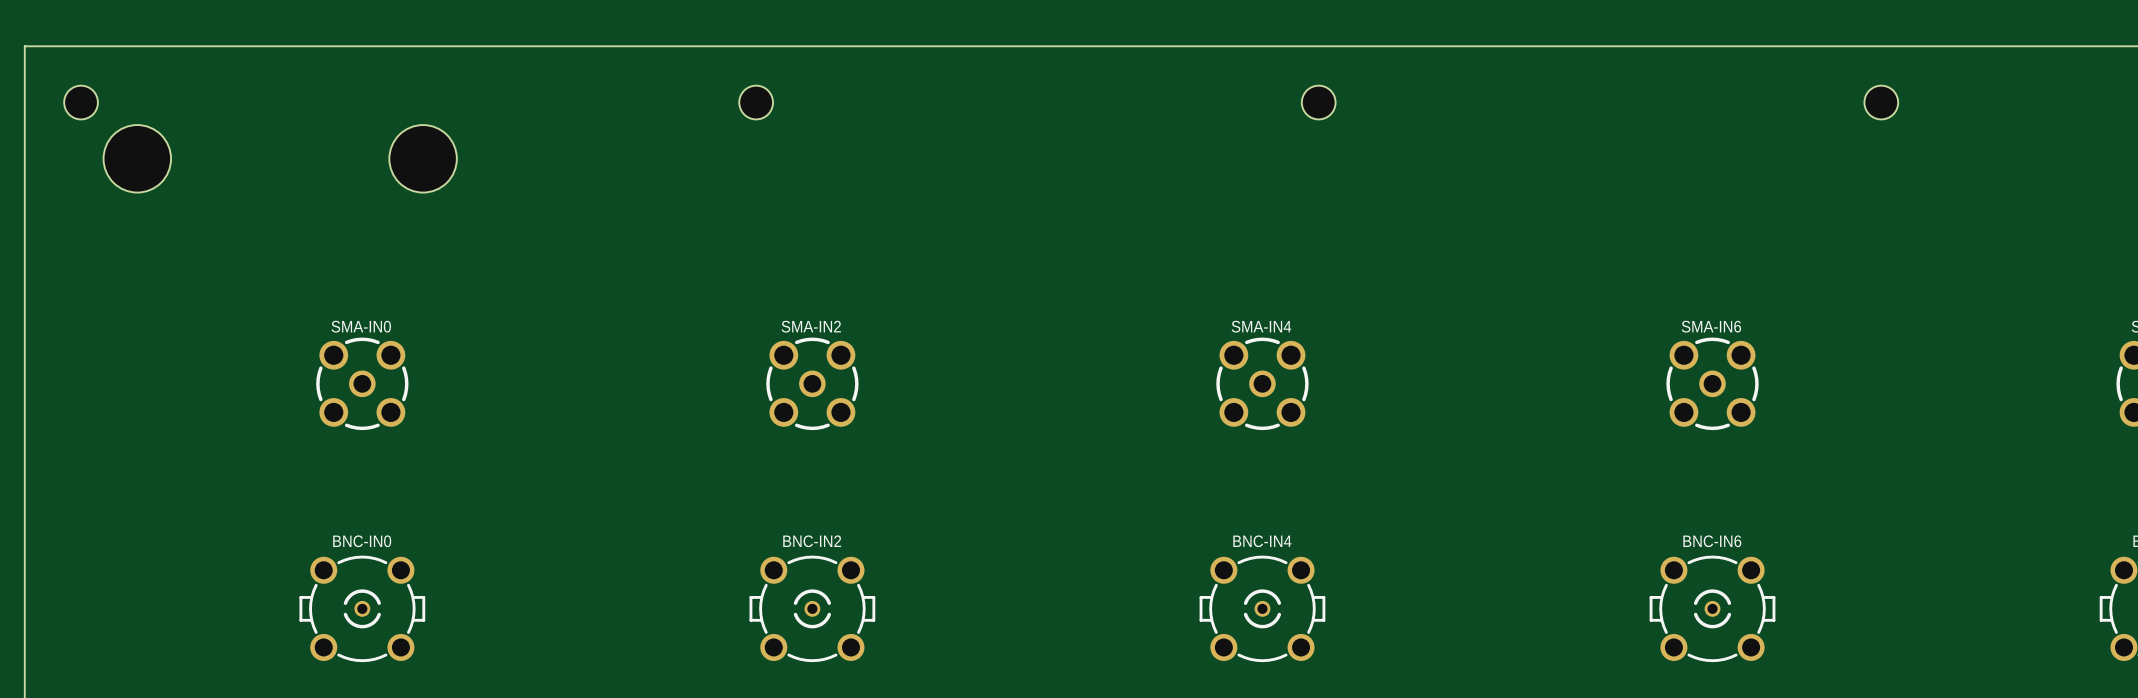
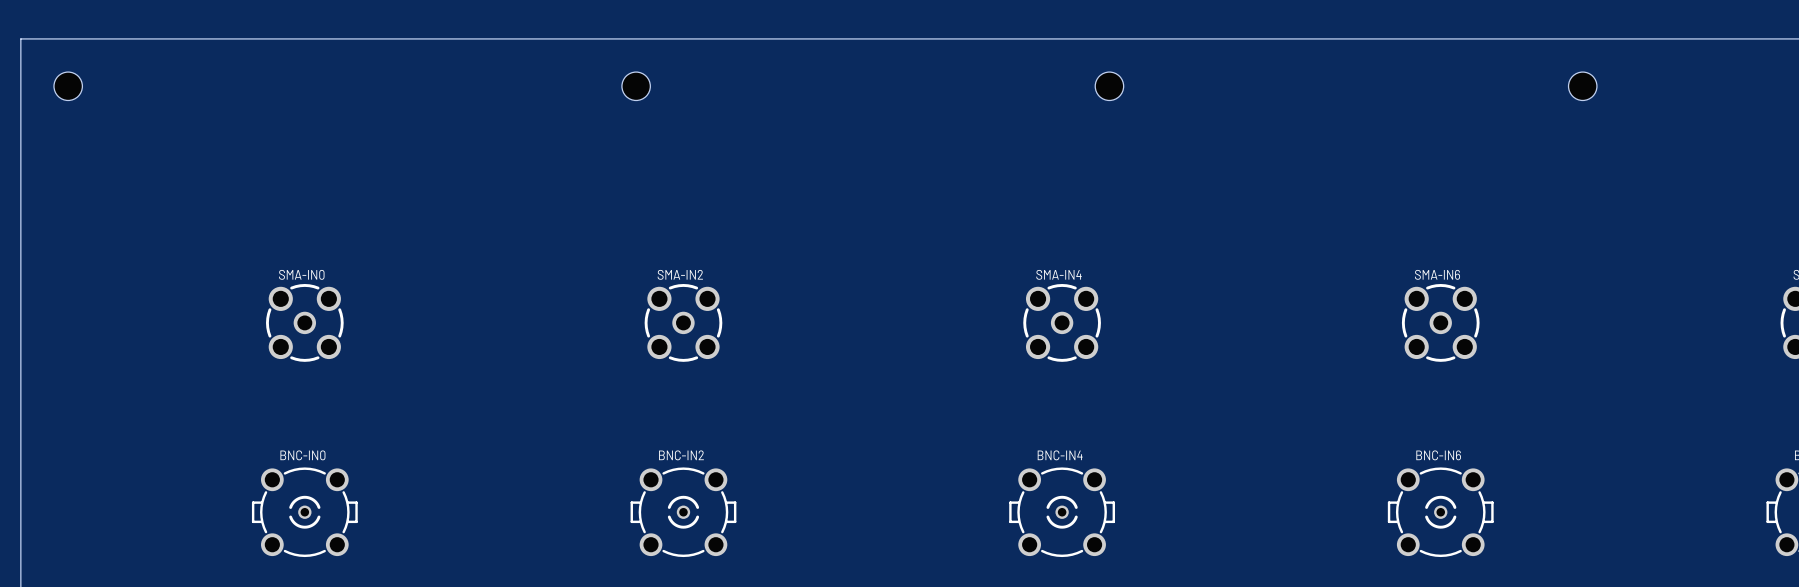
hole: (137, 158) -> none
hole: (423, 158) -> none

